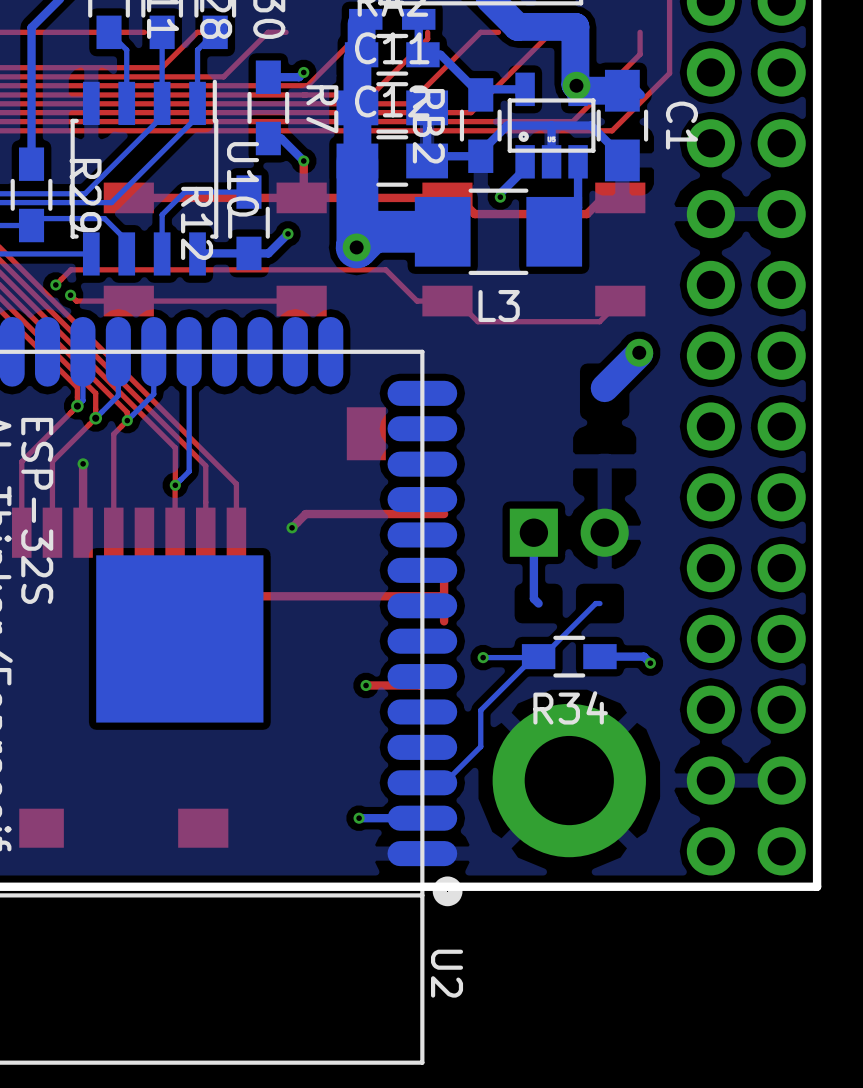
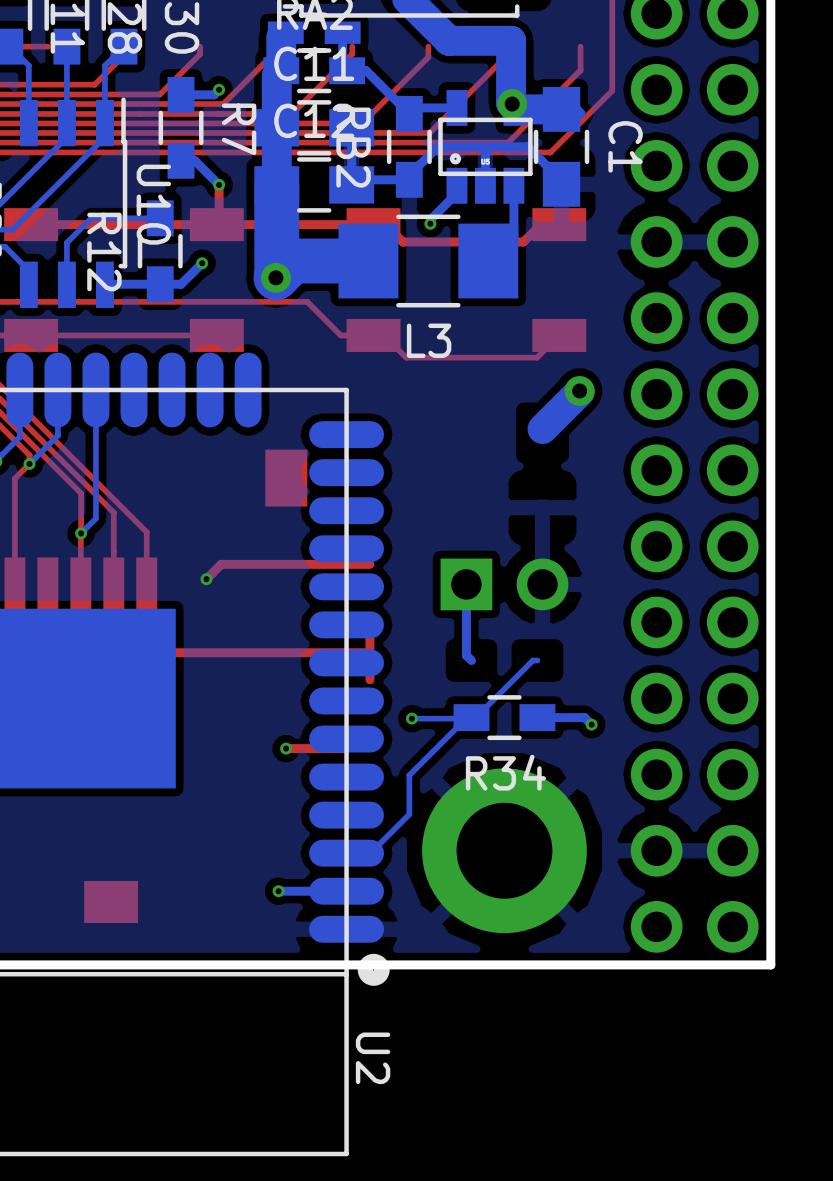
top track: (215, 32) (197, 32) (162, 67) -> (123, 46) (123, 55) (94, 84) (66, 84)
top track: (286, 32) (268, 32) (223, 76) -> (200, 46) (200, 54) (159, 94) (133, 94)
top track: (498, 32) (480, 32) (409, 103) -> (428, 46) (428, 57) (362, 123) (332, 123)
top track: (569, 32) (551, 32) (471, 112) -> (504, 46) (504, 58) (429, 132) (398, 132)

